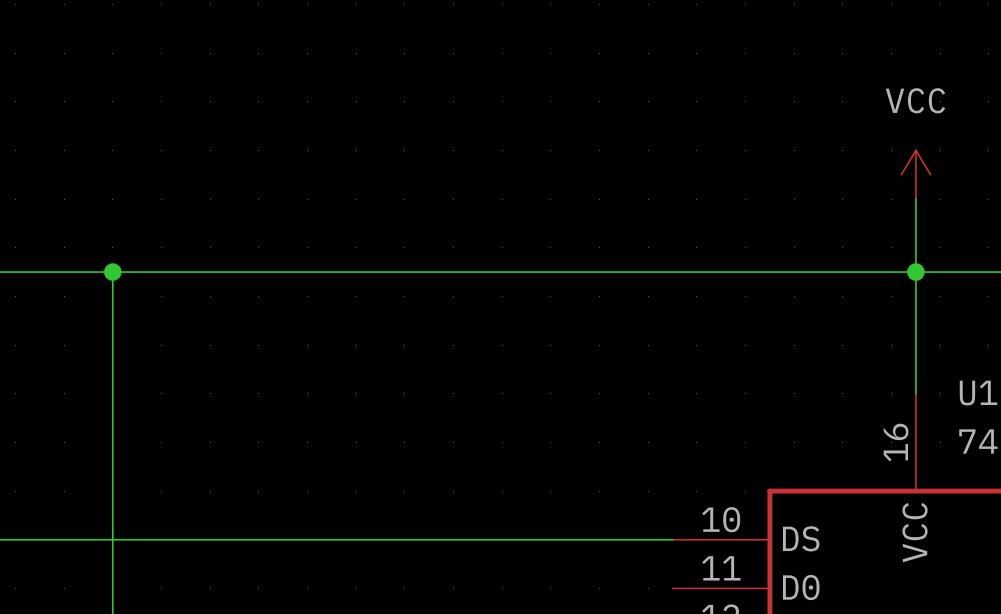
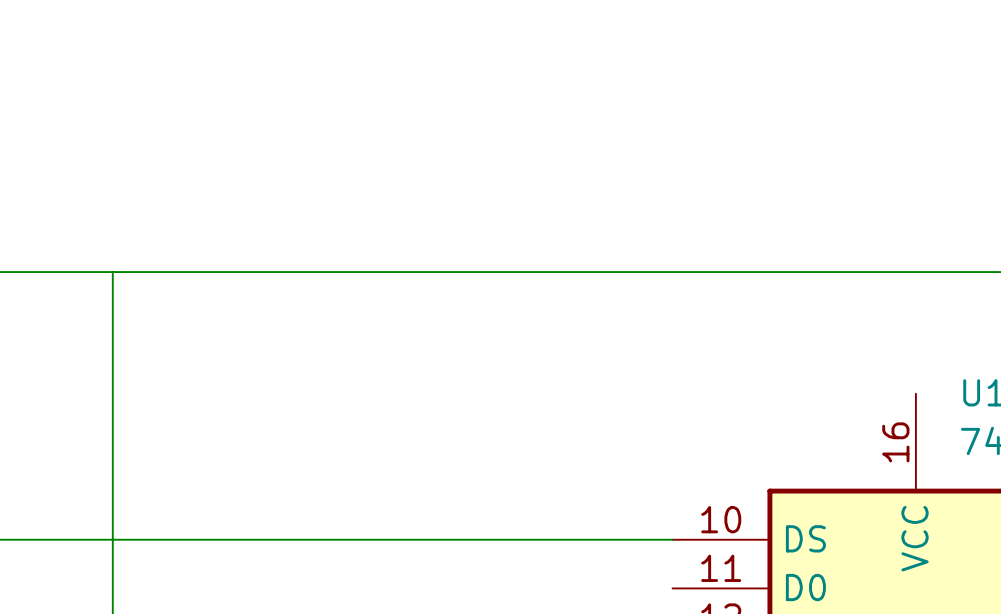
power symbol: VCC (915, 174) -> none
wire: (915, 199) (915, 393) -> none
junction: (112, 272) -> none
junction: (915, 272) -> none

